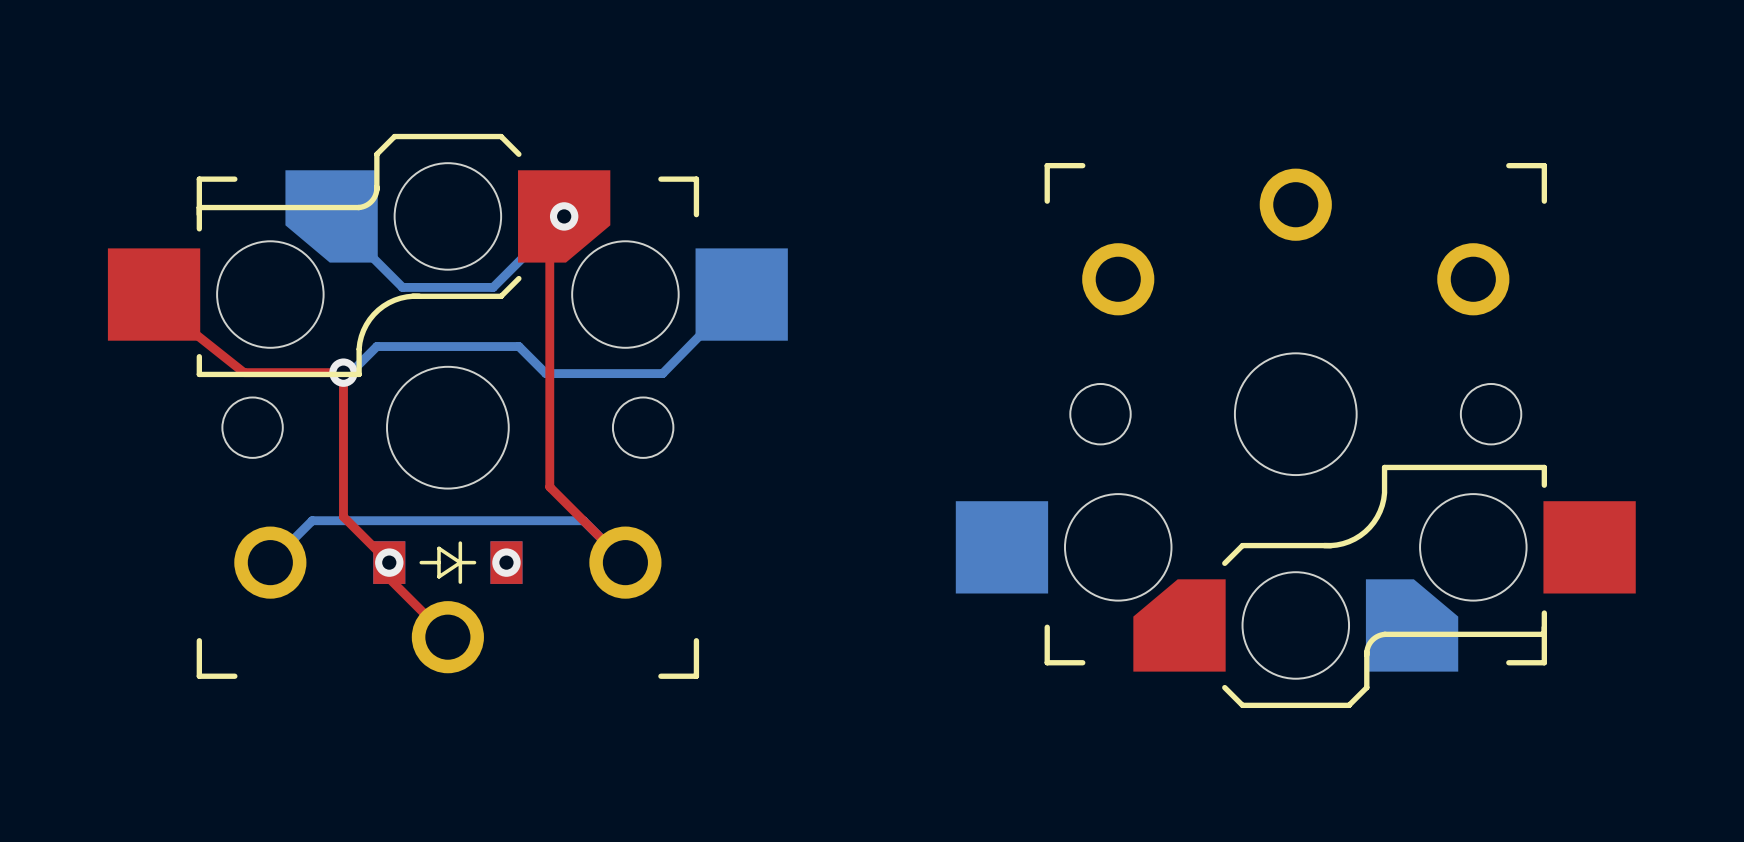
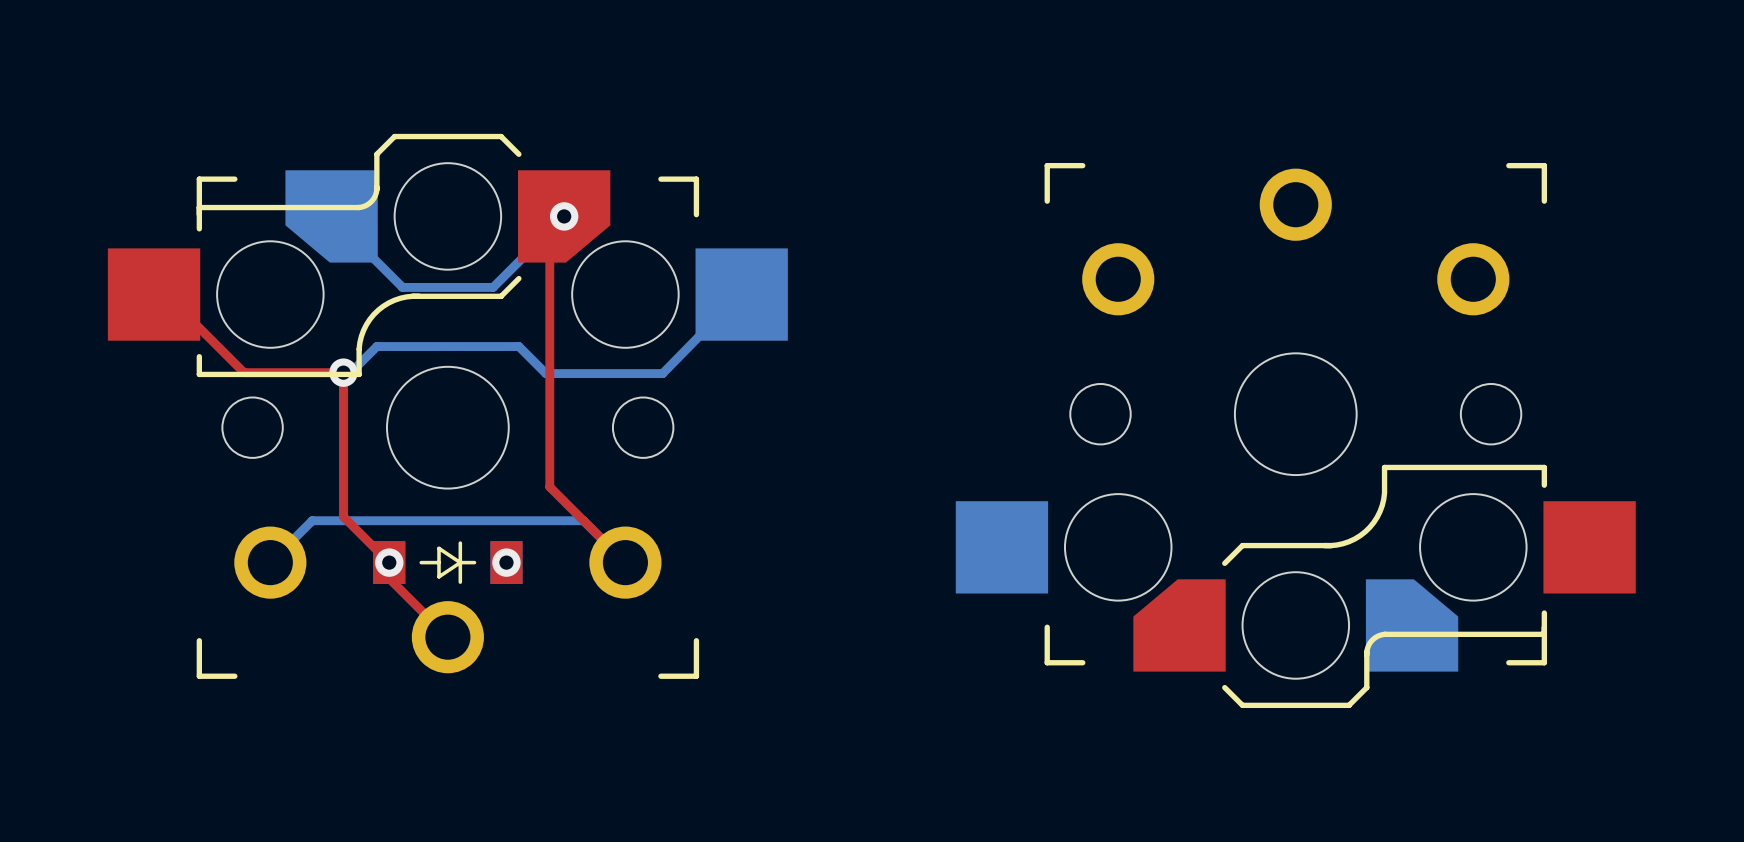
top track: (190, 330) (244, 372) -> (154, 294) (165, 294) (244, 372)

